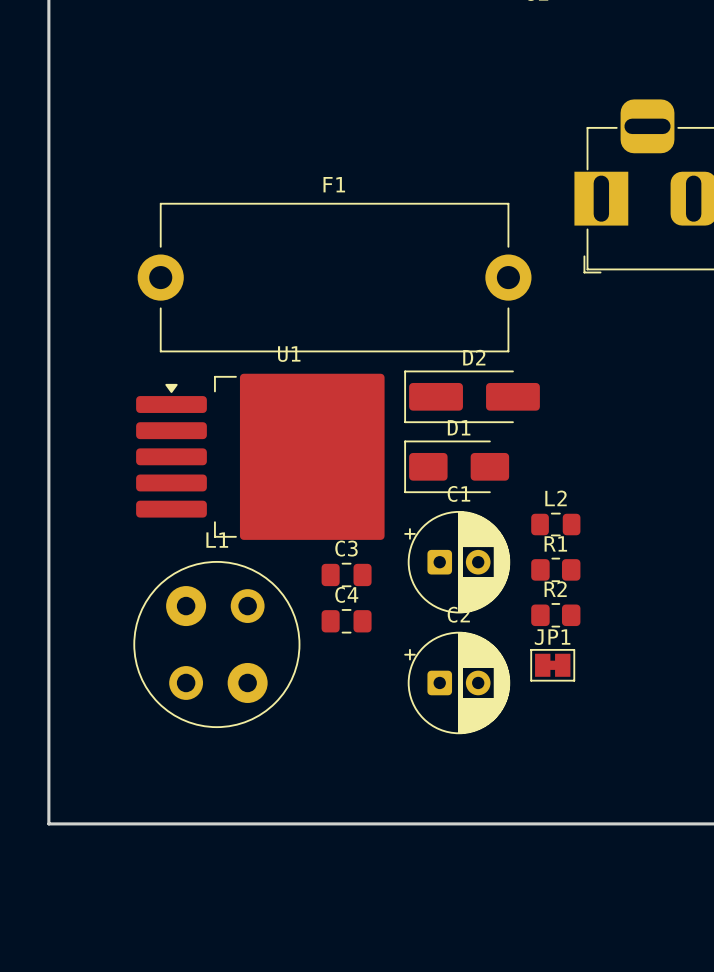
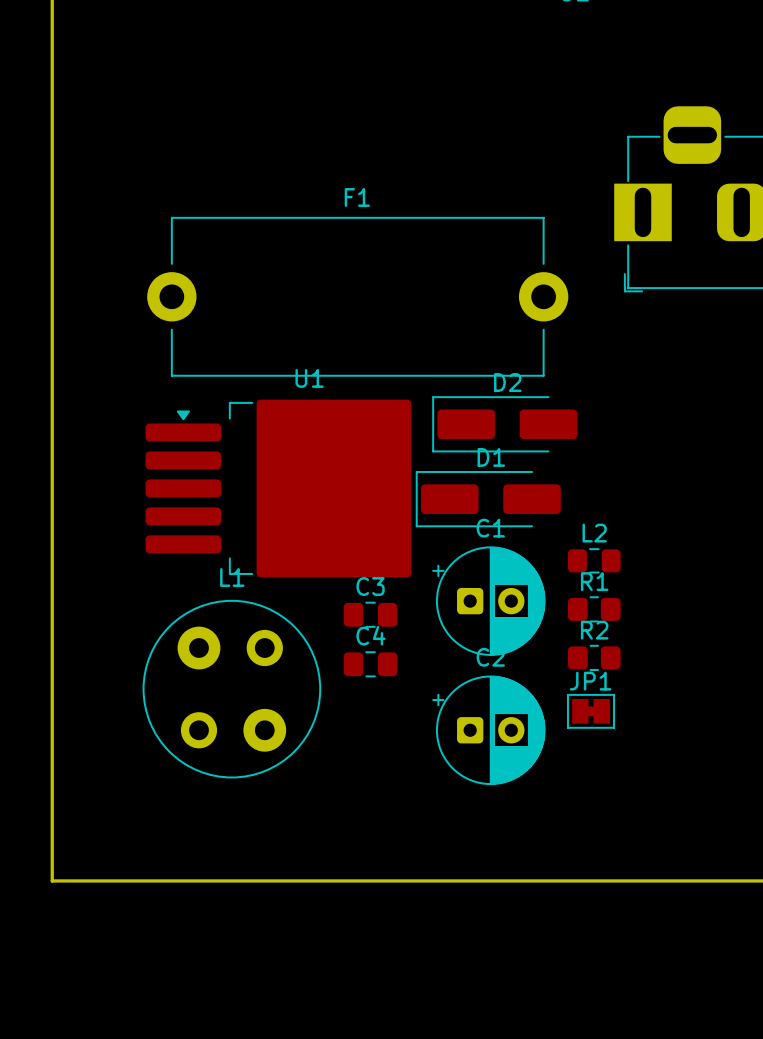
D1 footprint: [404, 440, 510, 494] -> [415, 471, 561, 528]

